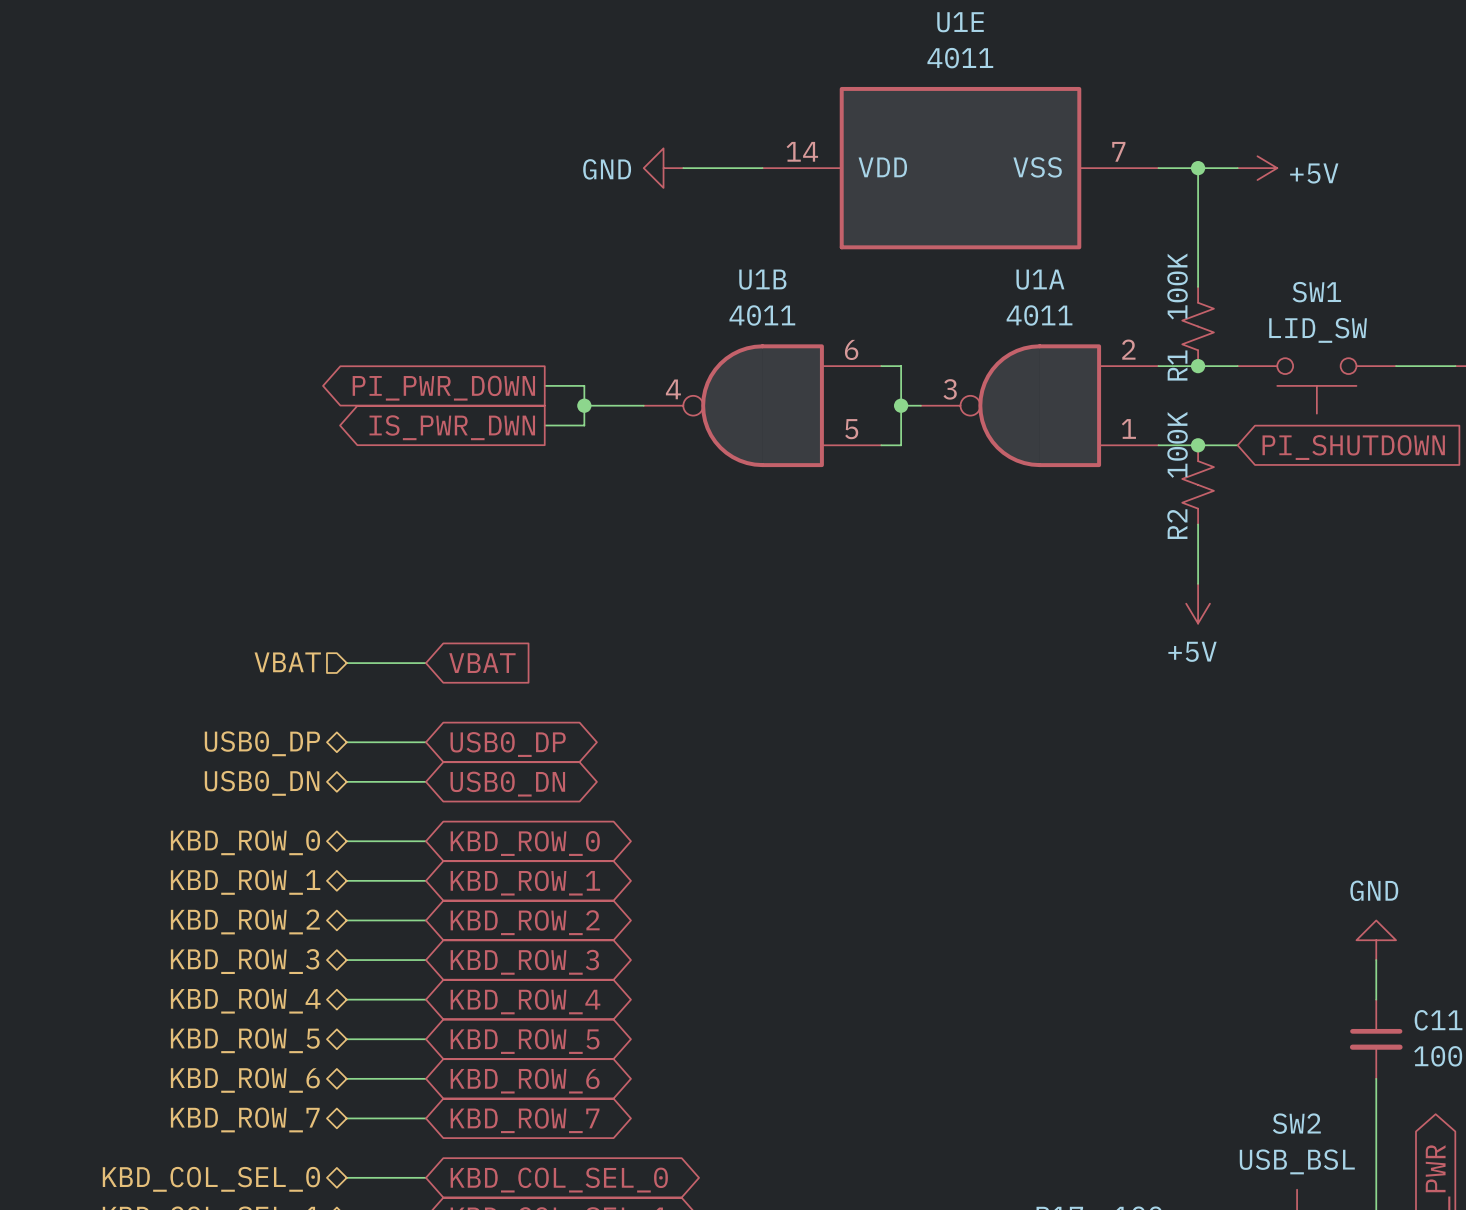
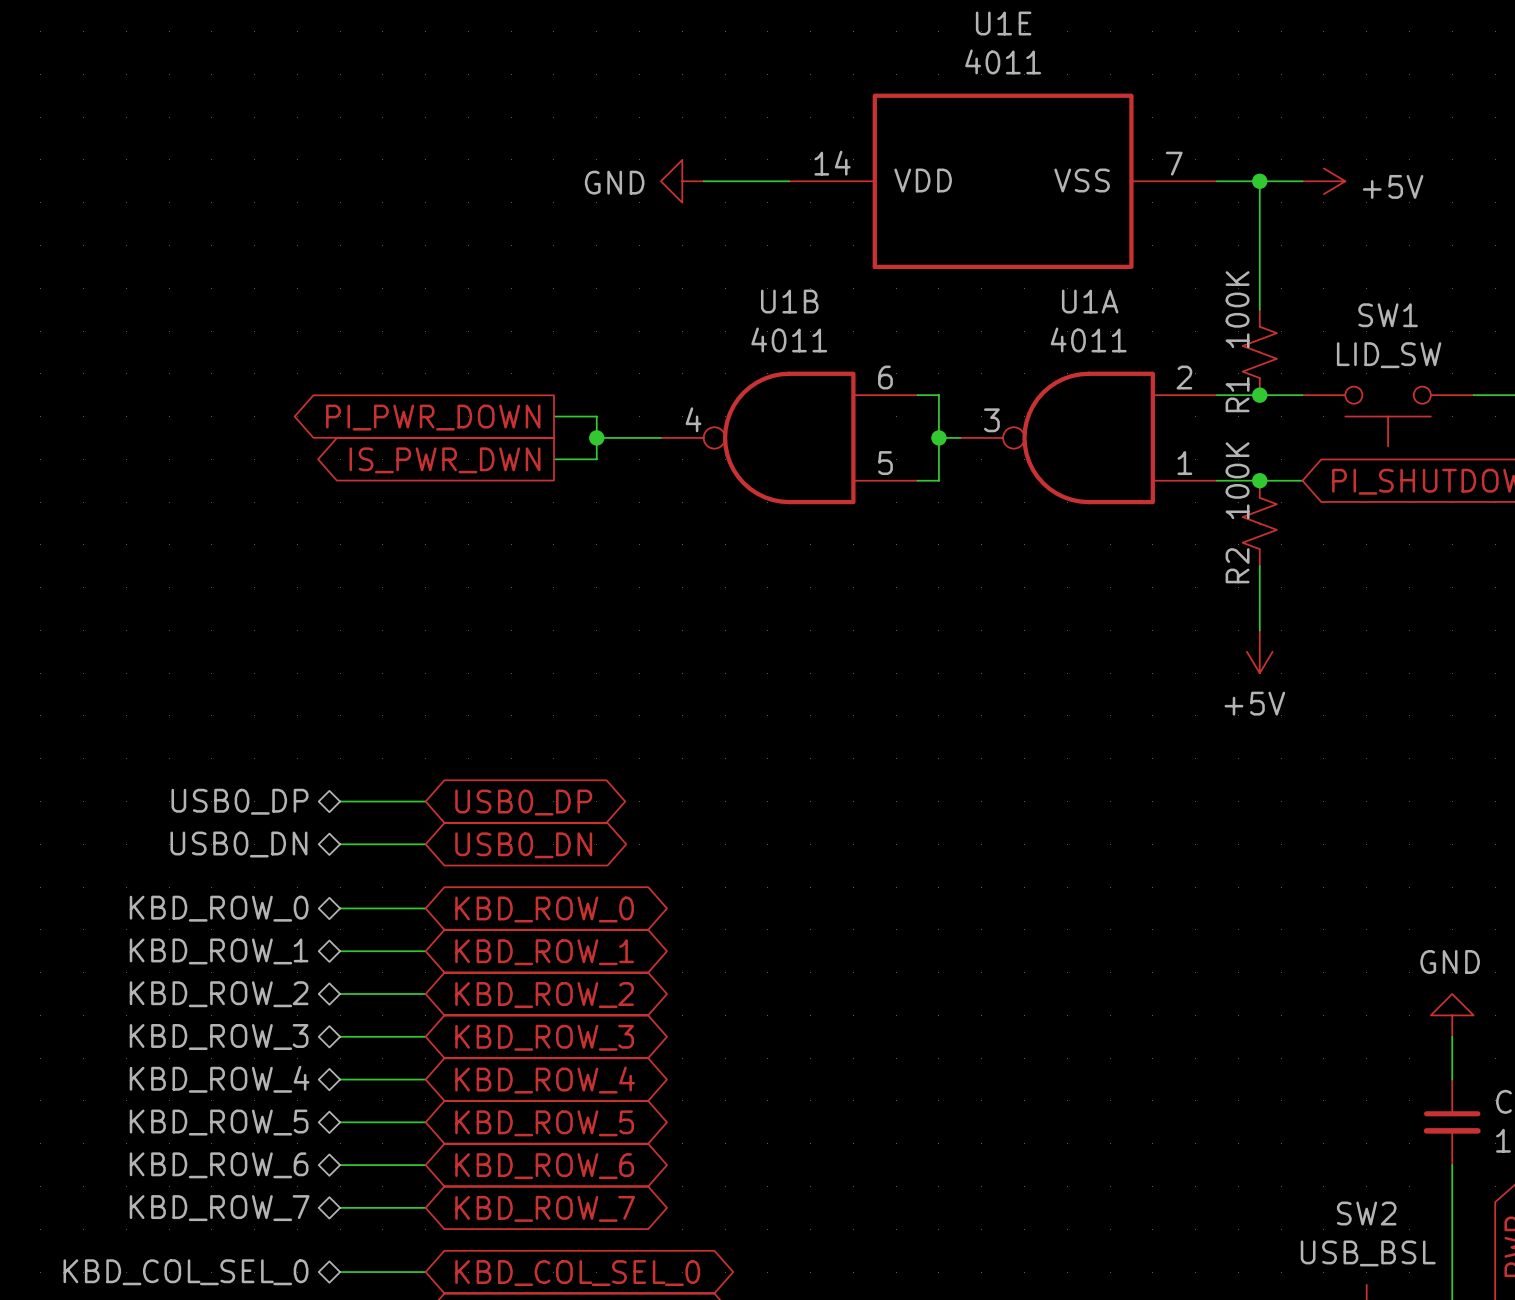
hierarchical label: VBAT (287, 662) -> none
wire: (346, 663) (425, 663) -> none
global label: VBAT (482, 663) -> none

